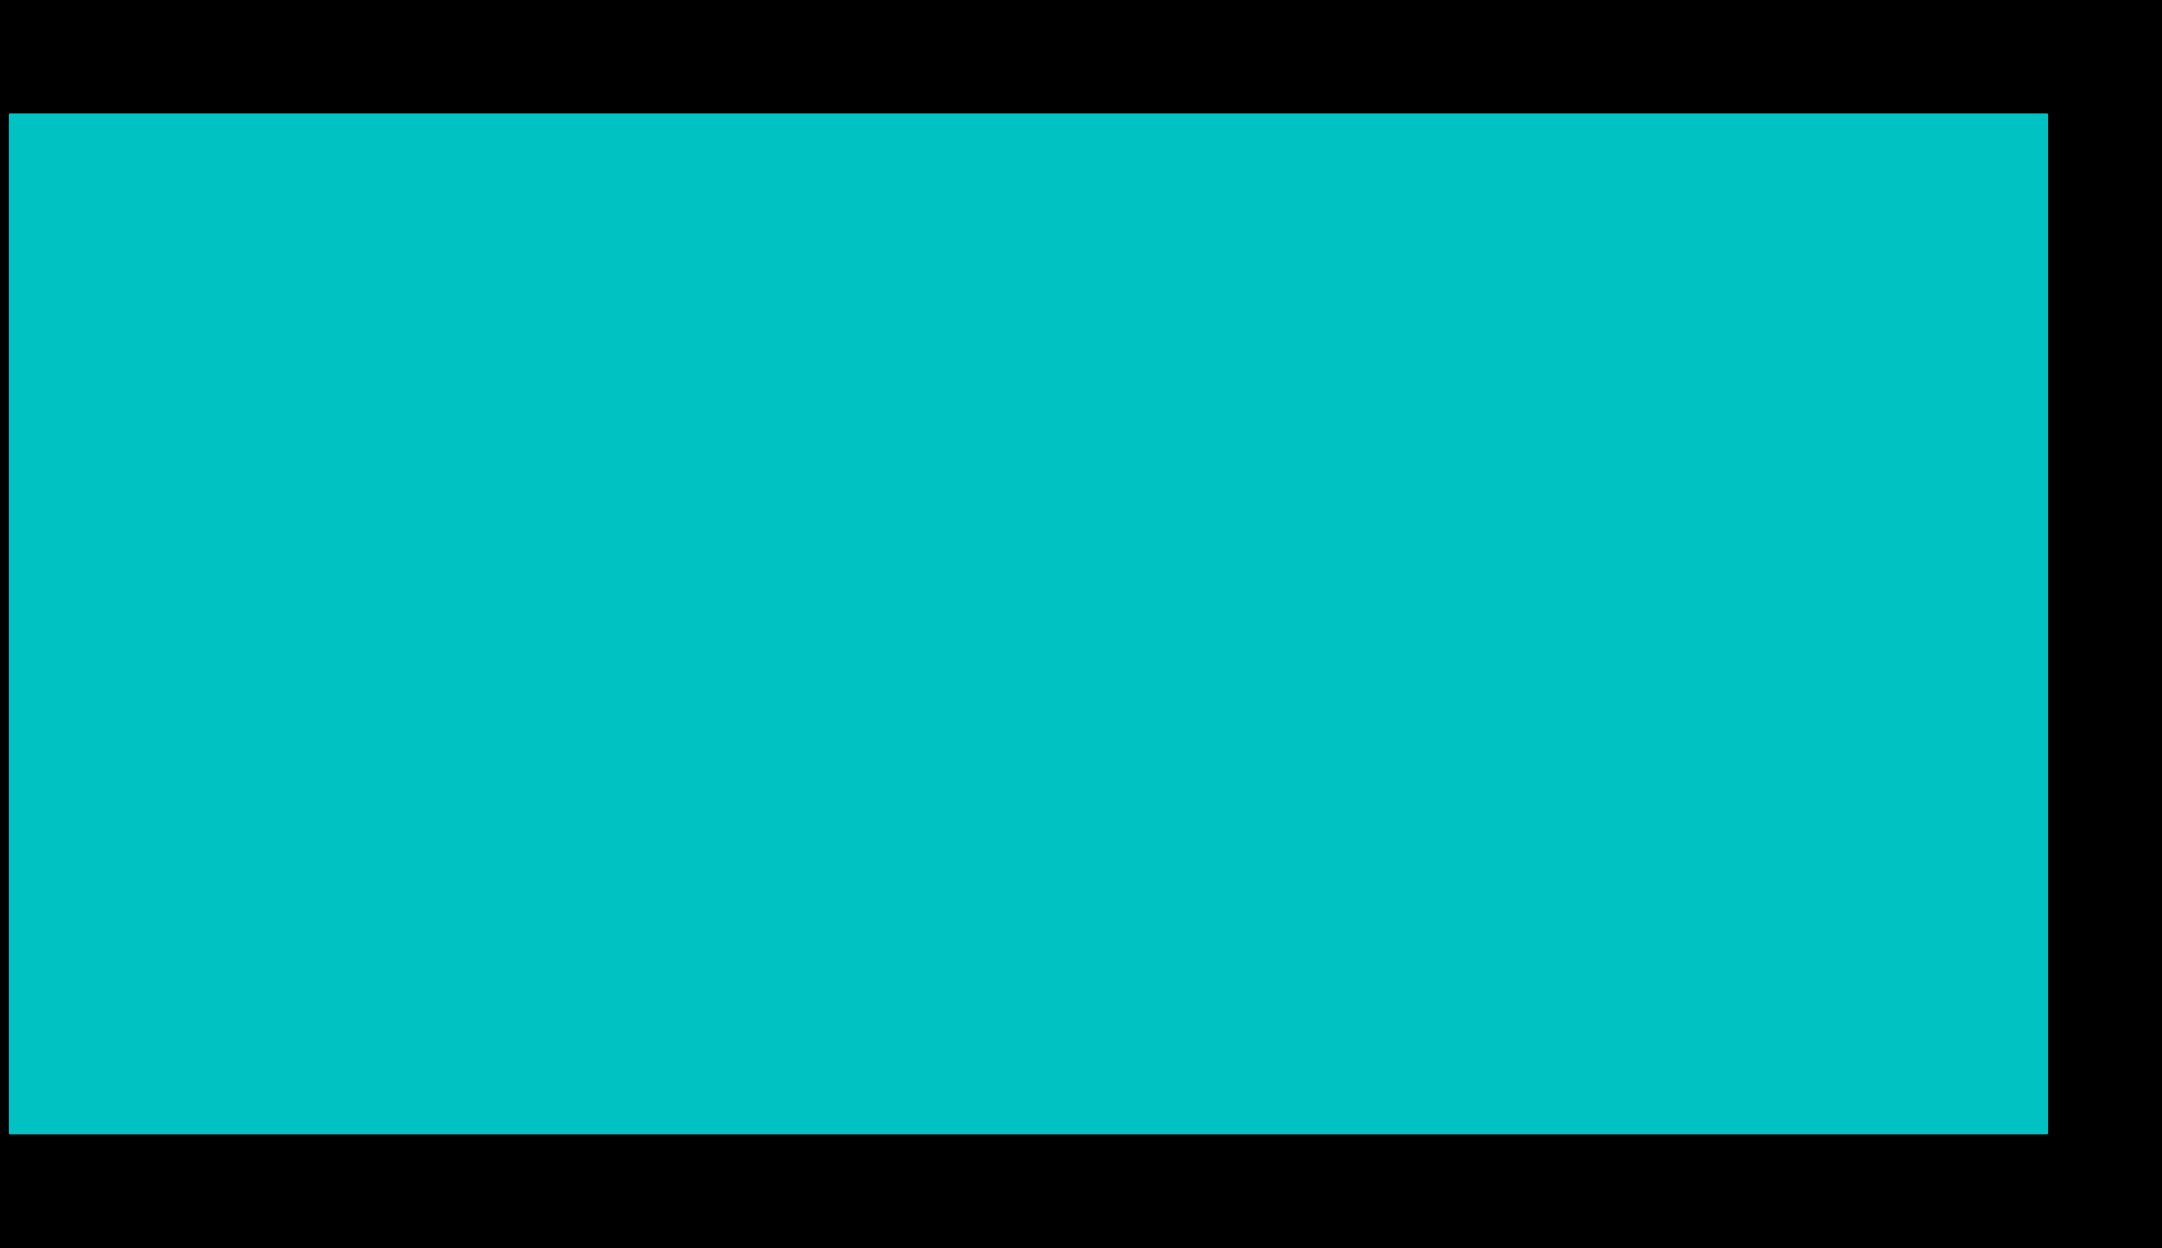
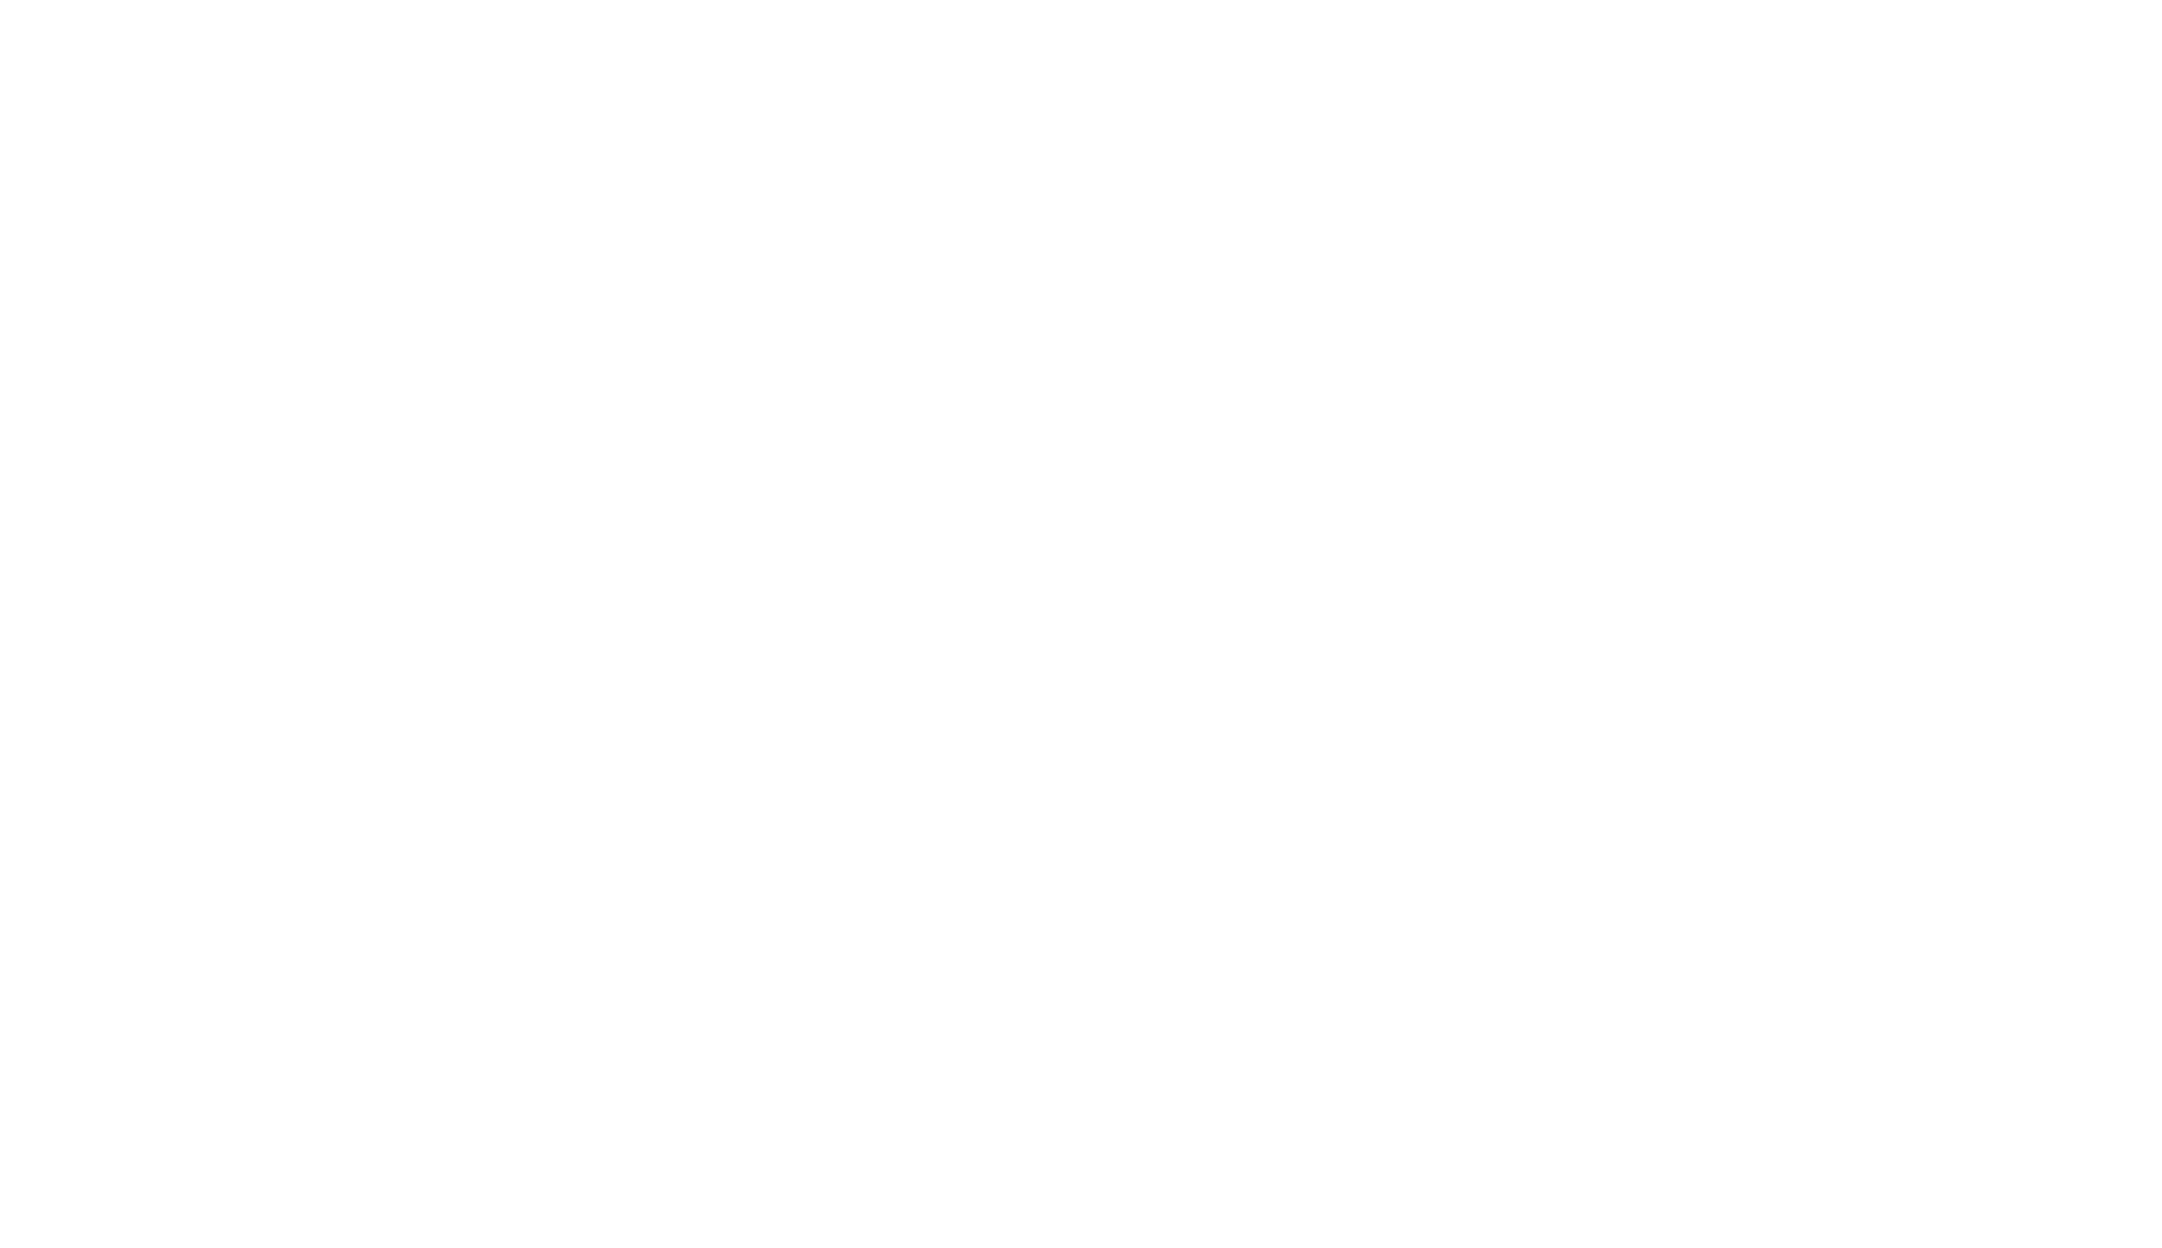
drawing: [8, 113, 2049, 1135] -> none

